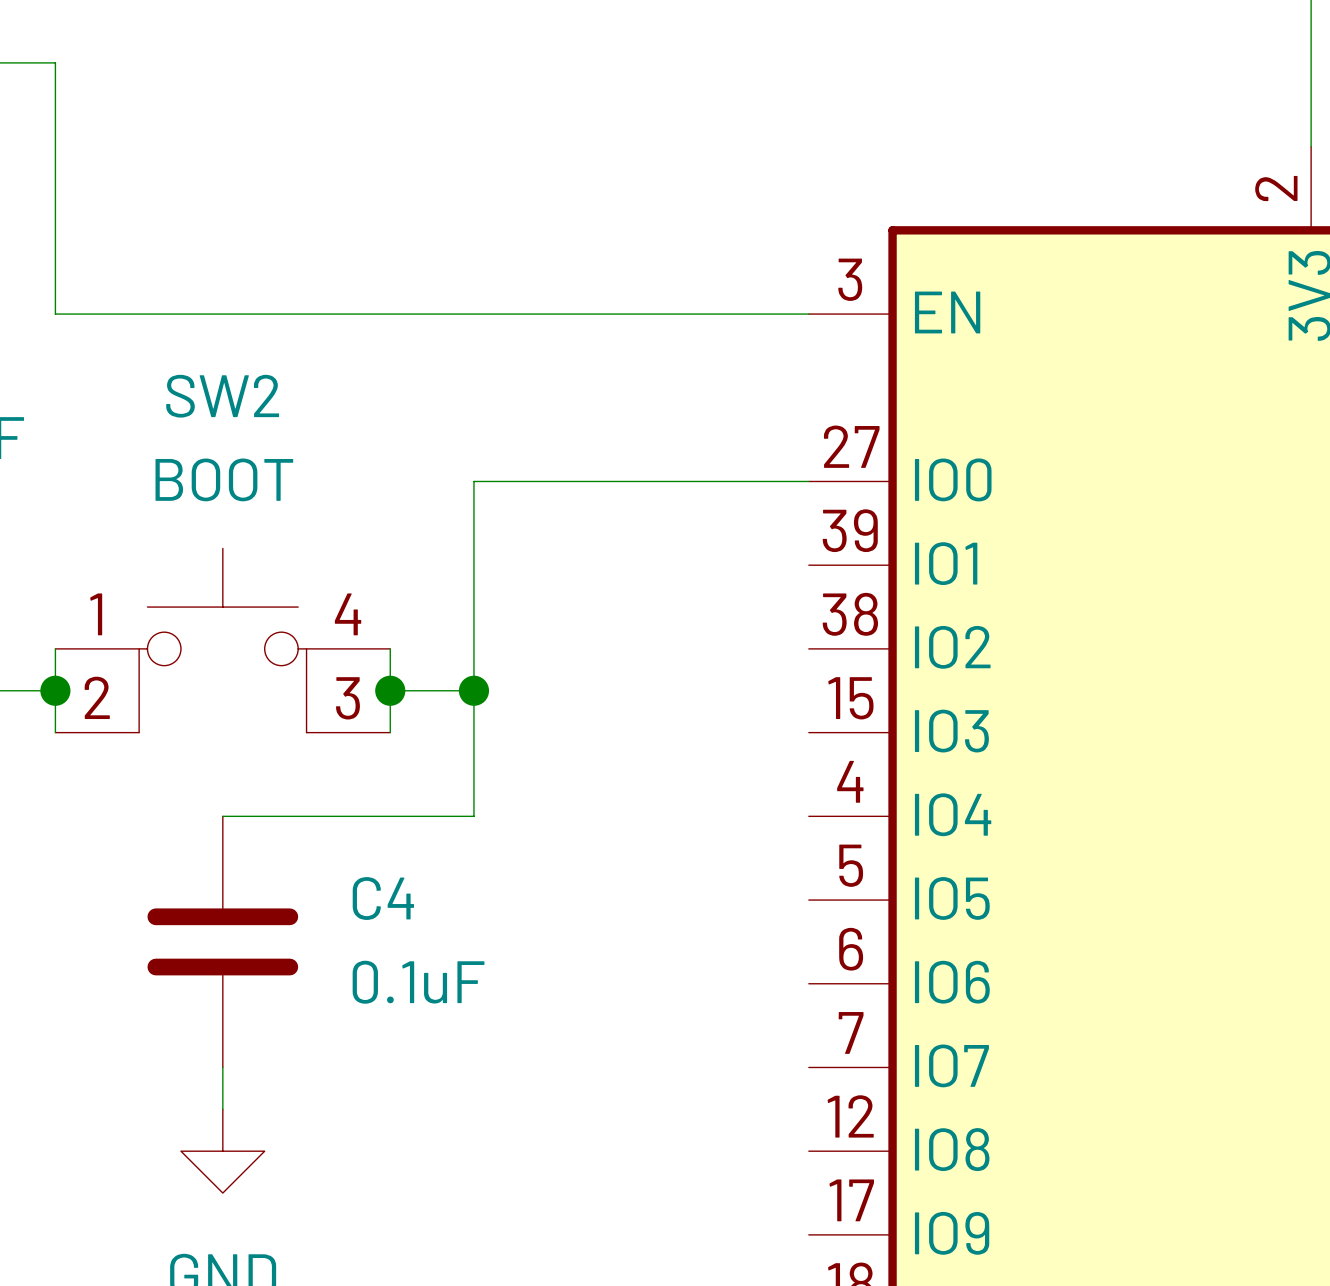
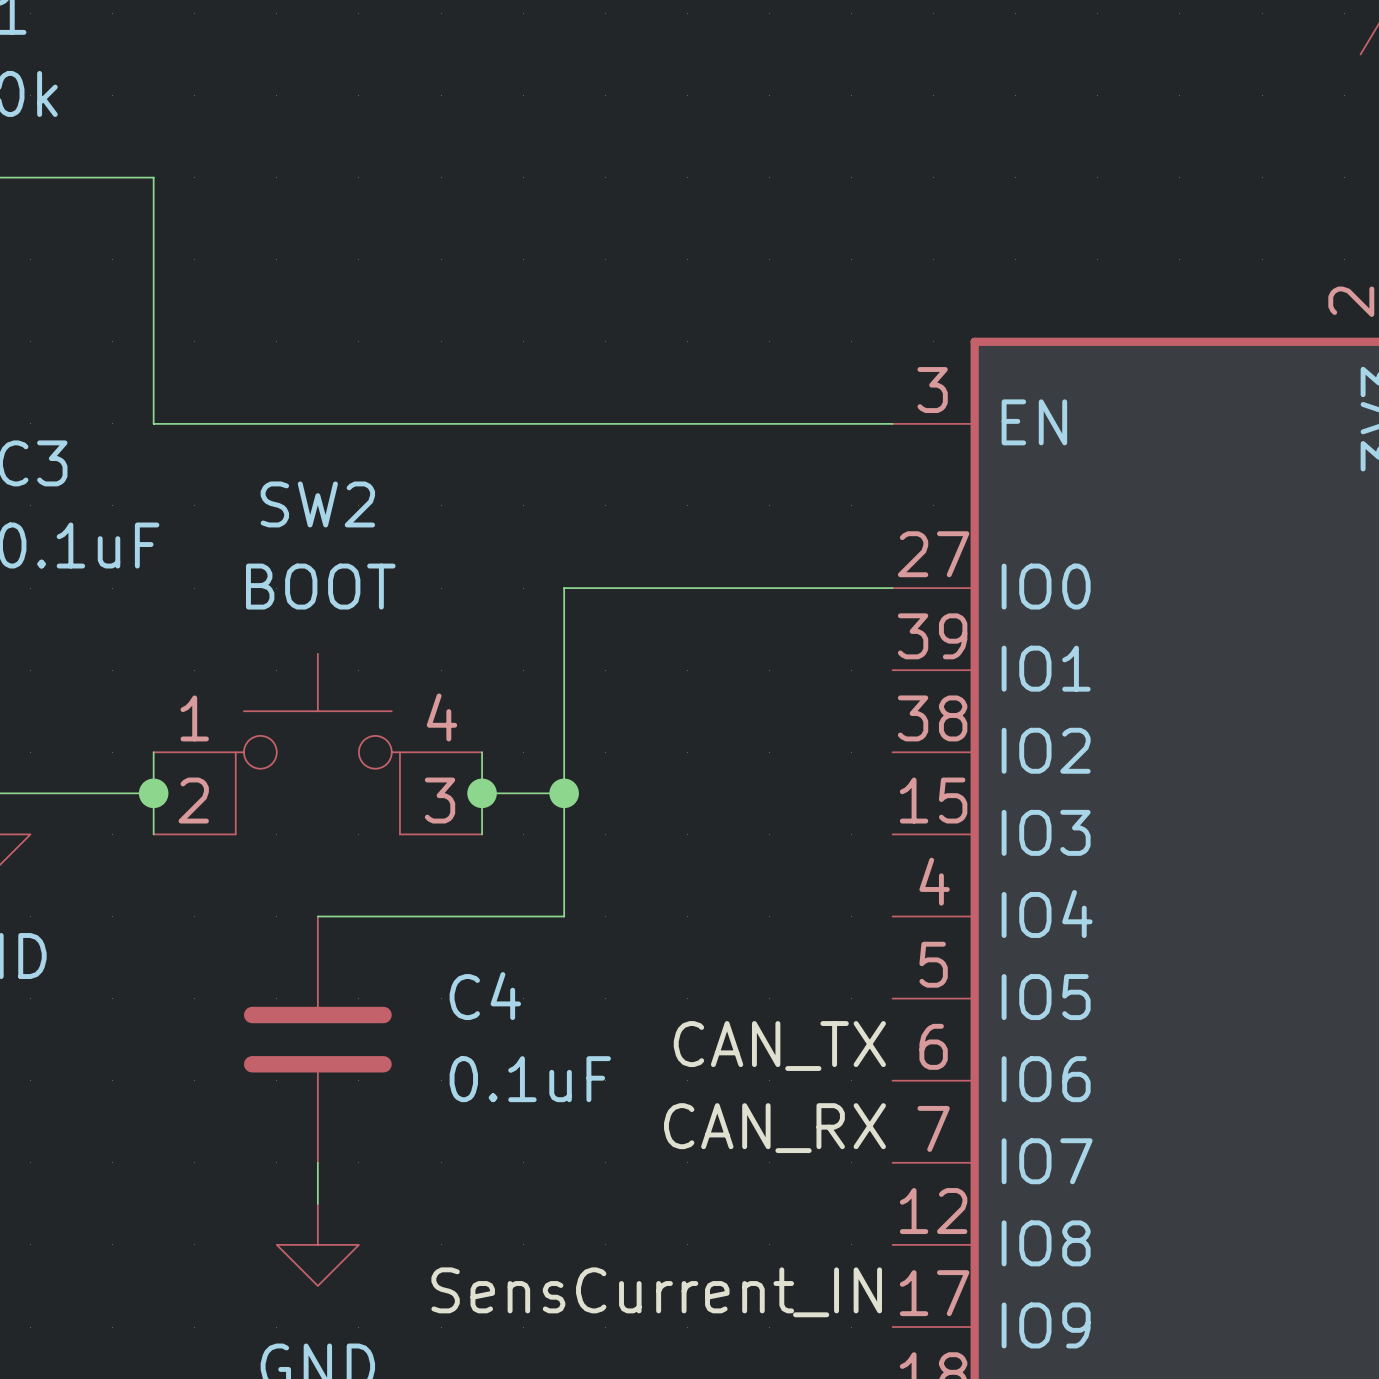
label: none -> CAN_TX (779, 1046)
label: none -> CAN_RX (774, 1128)
label: none -> SensCurrent_IN (656, 1292)

